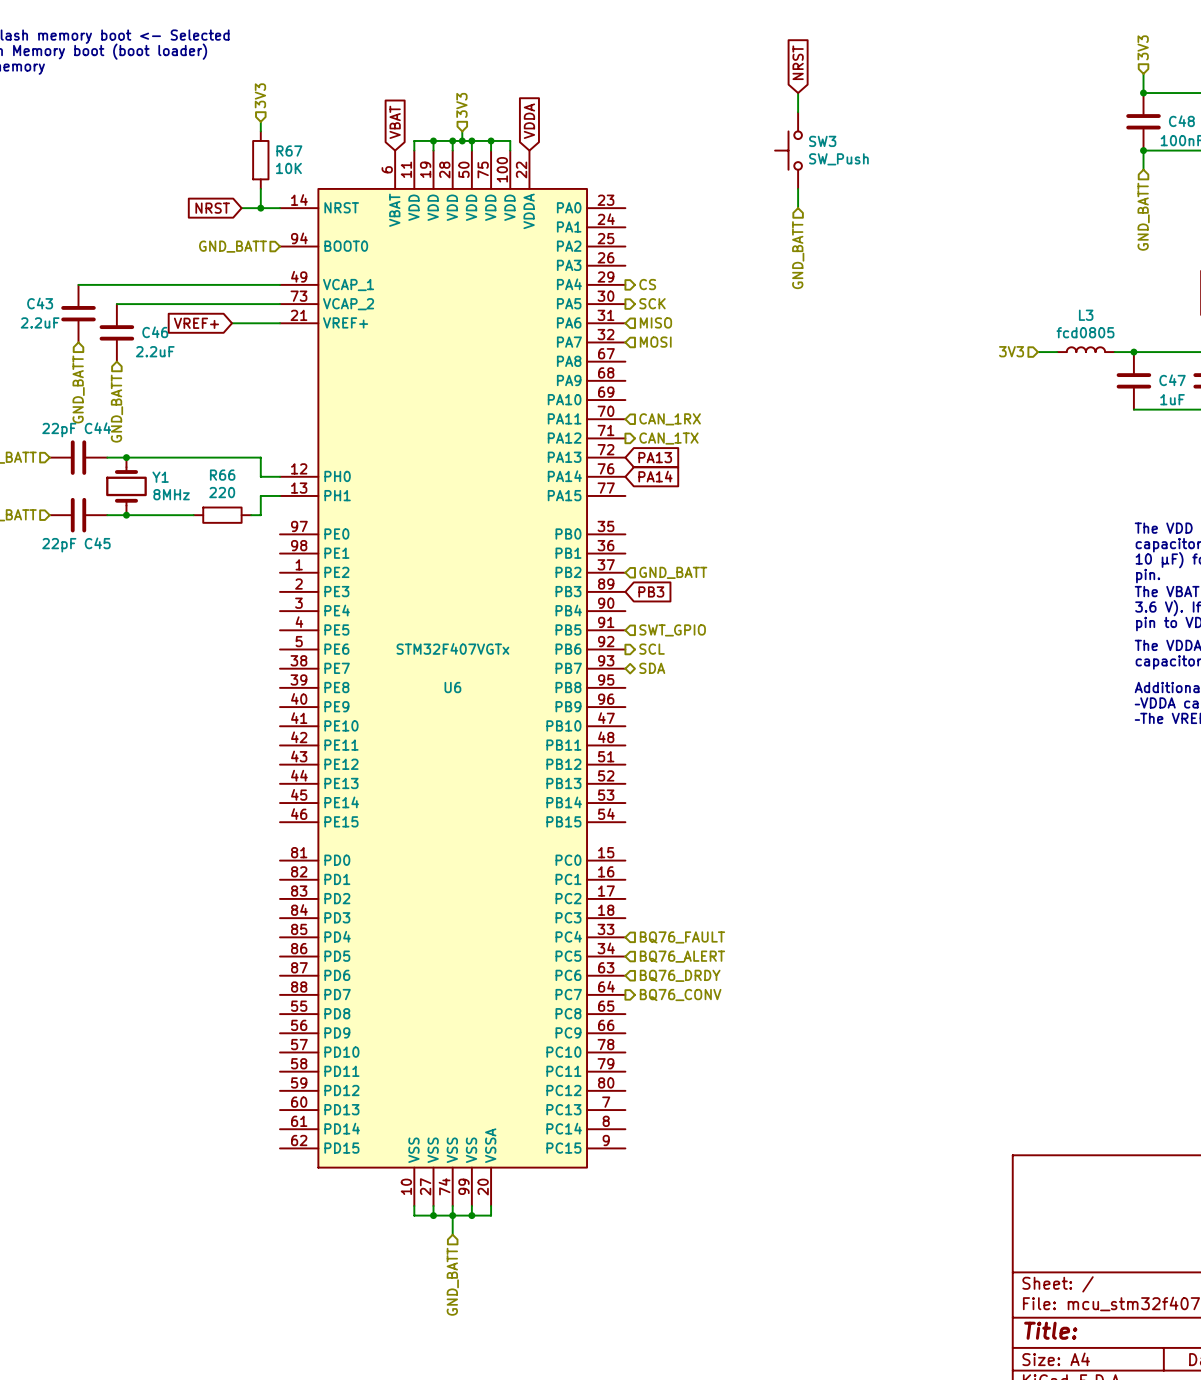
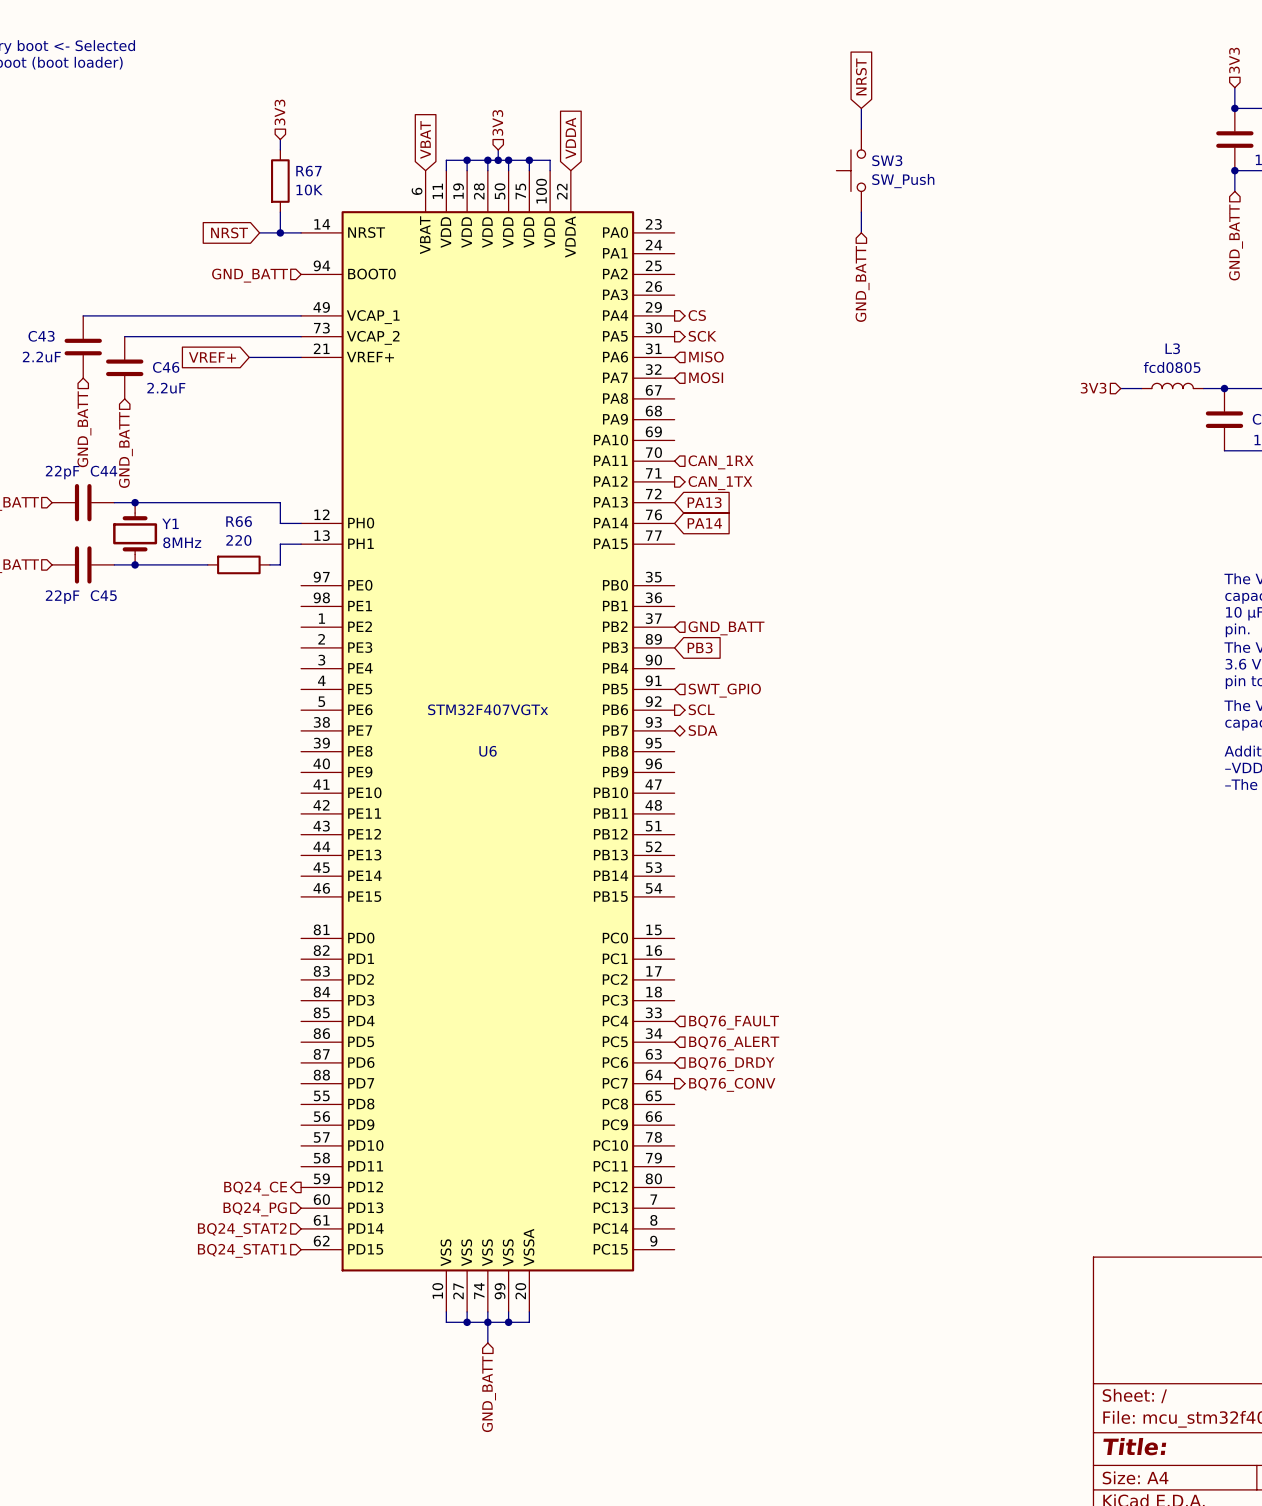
hierarchical label: none -> BQ24_CE (255, 1188)
hierarchical label: none -> BQ24_PG (255, 1209)
hierarchical label: none -> BQ24_STAT2 (242, 1230)
hierarchical label: none -> BQ24_STAT1 (242, 1250)

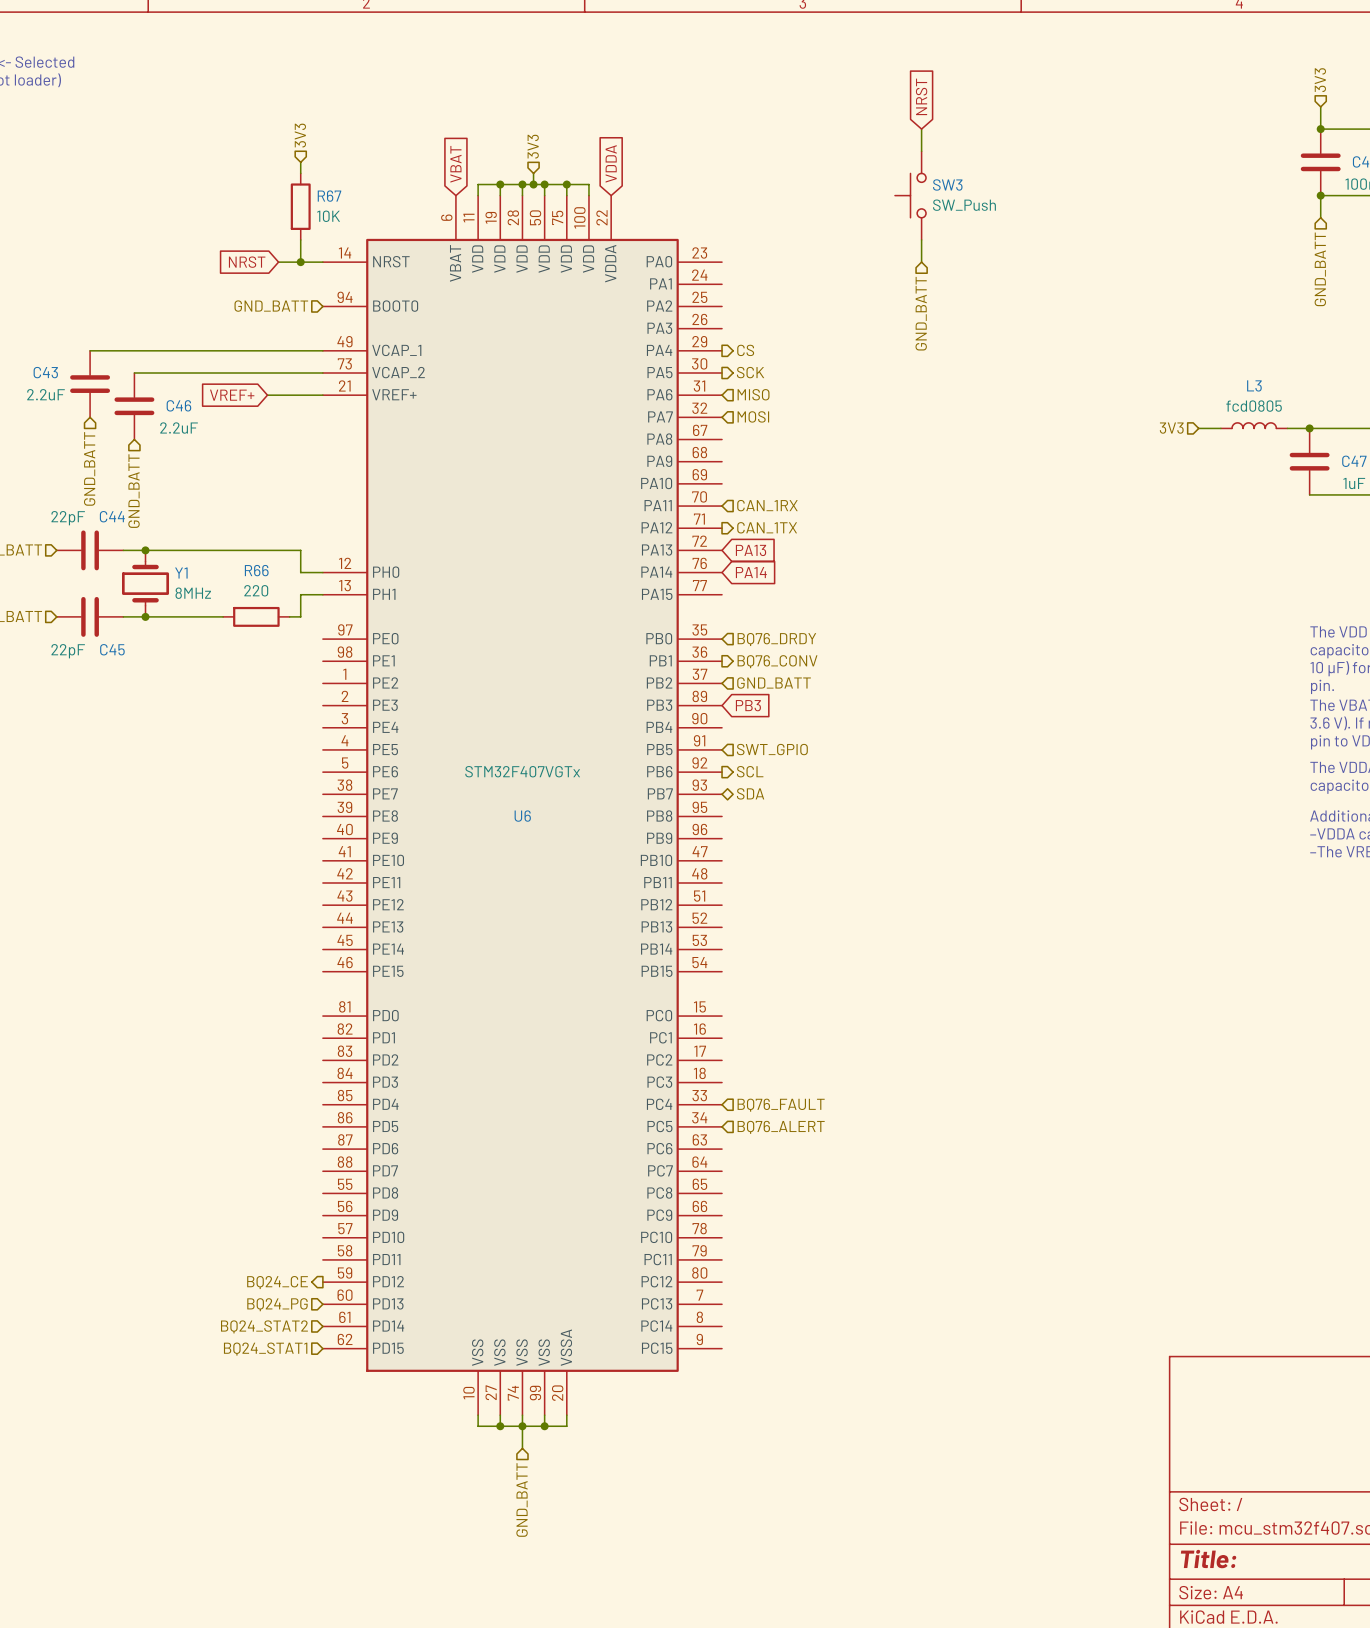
hierarchical label: none -> BQ76_DRDY (776, 639)
hierarchical label: none -> BQ76_CONV (777, 661)
hierarchical label: BQ76_DRDY (731, 1064) -> none
hierarchical label: BQ76_CONV (732, 1084) -> none

